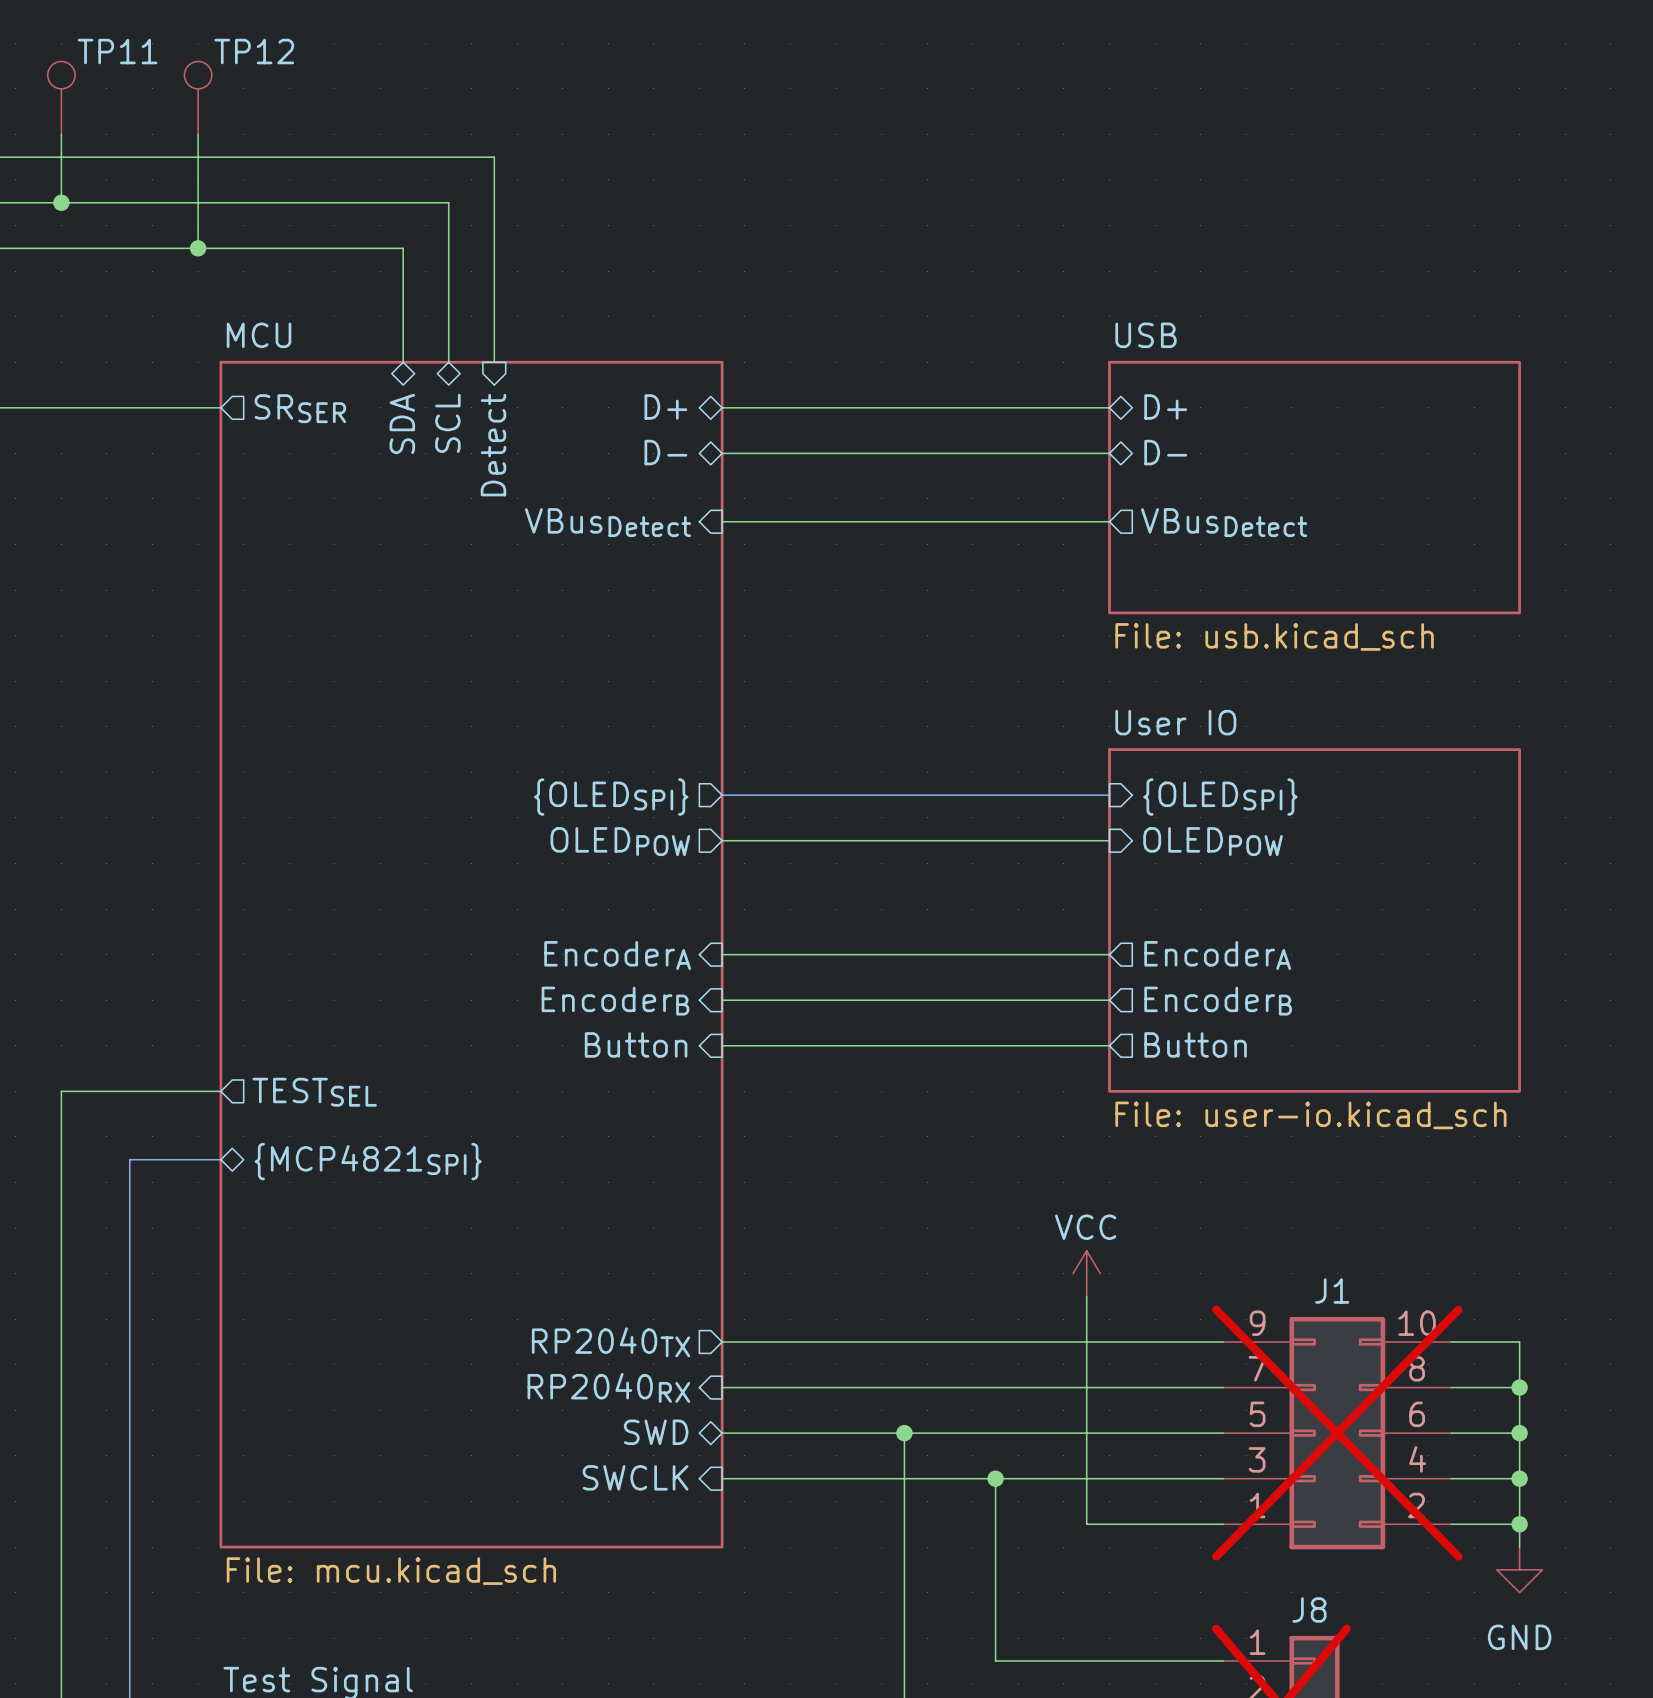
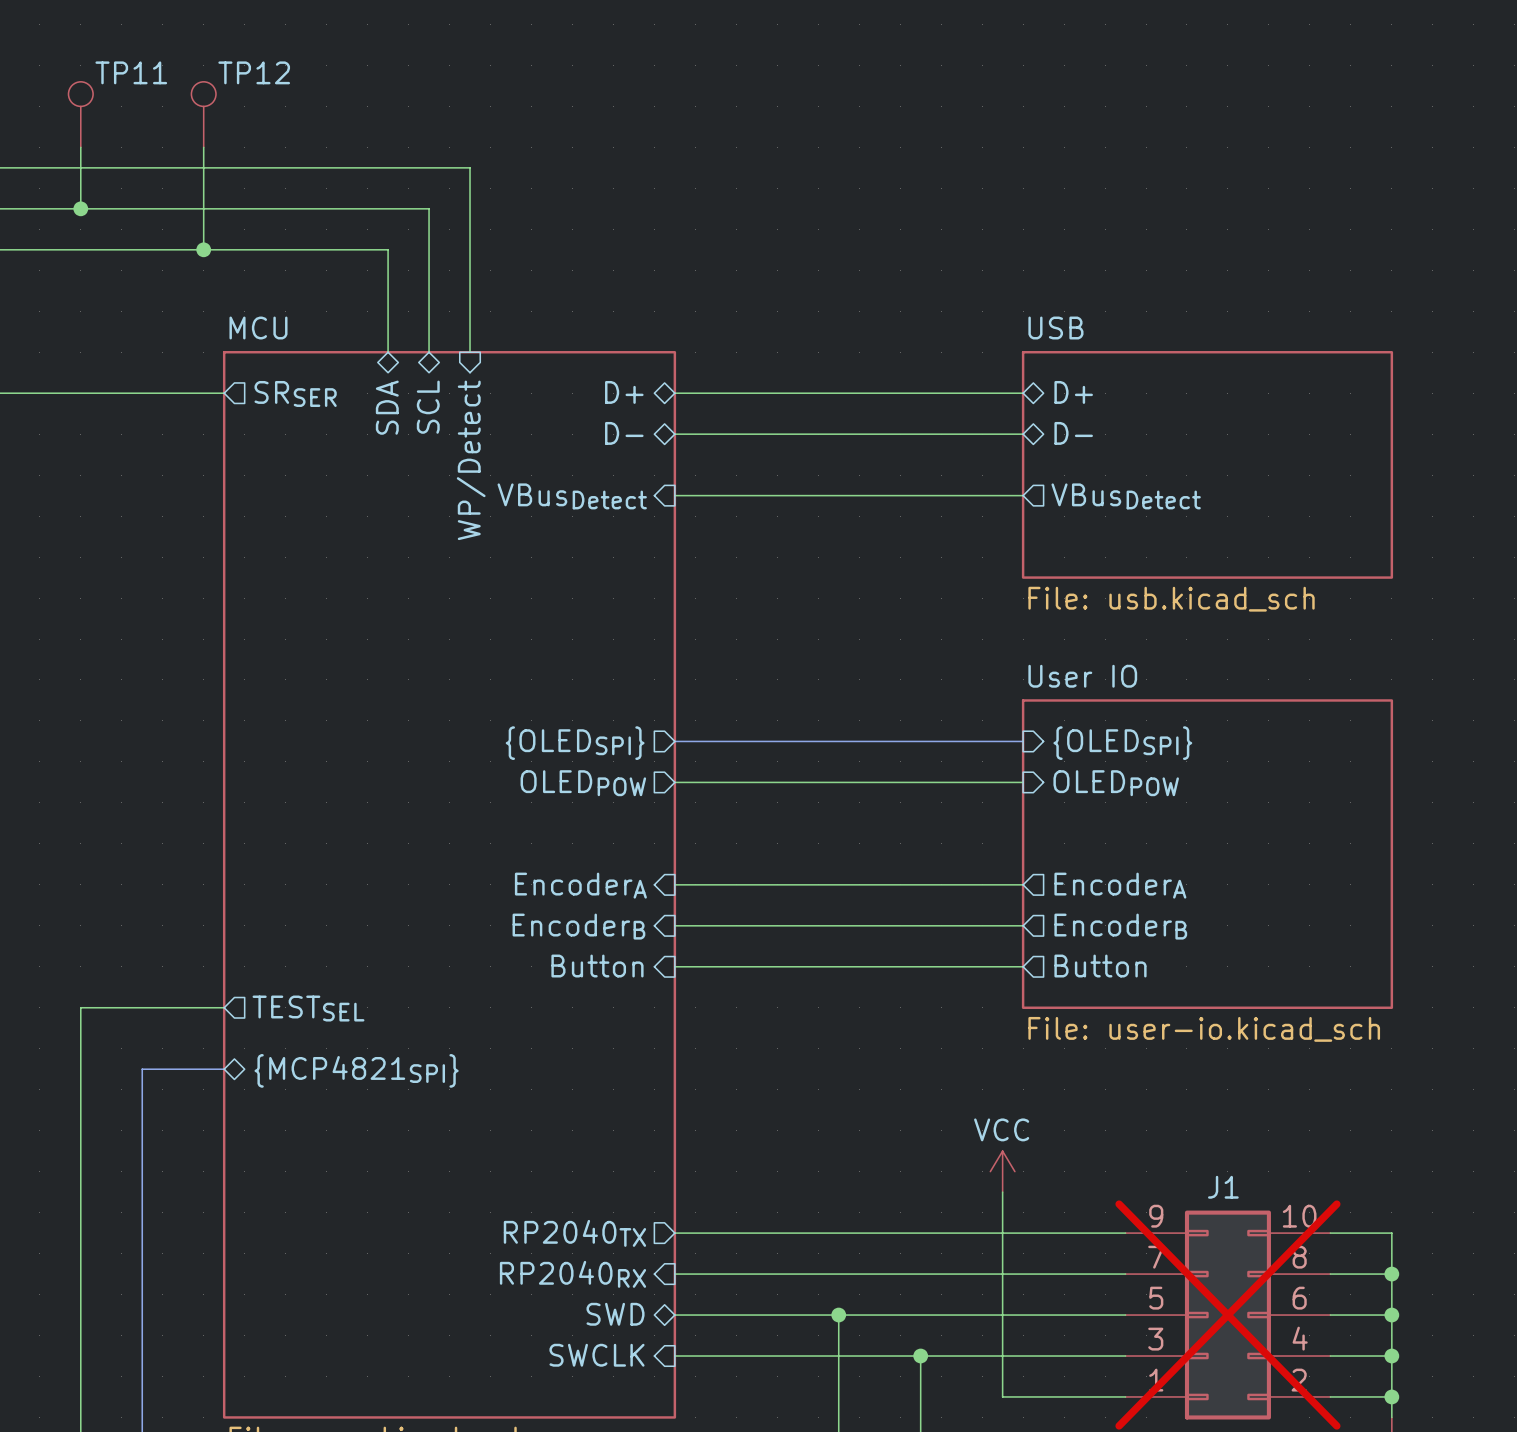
sheet pin: Detect (493, 445) -> WP/Detect (471, 460)

